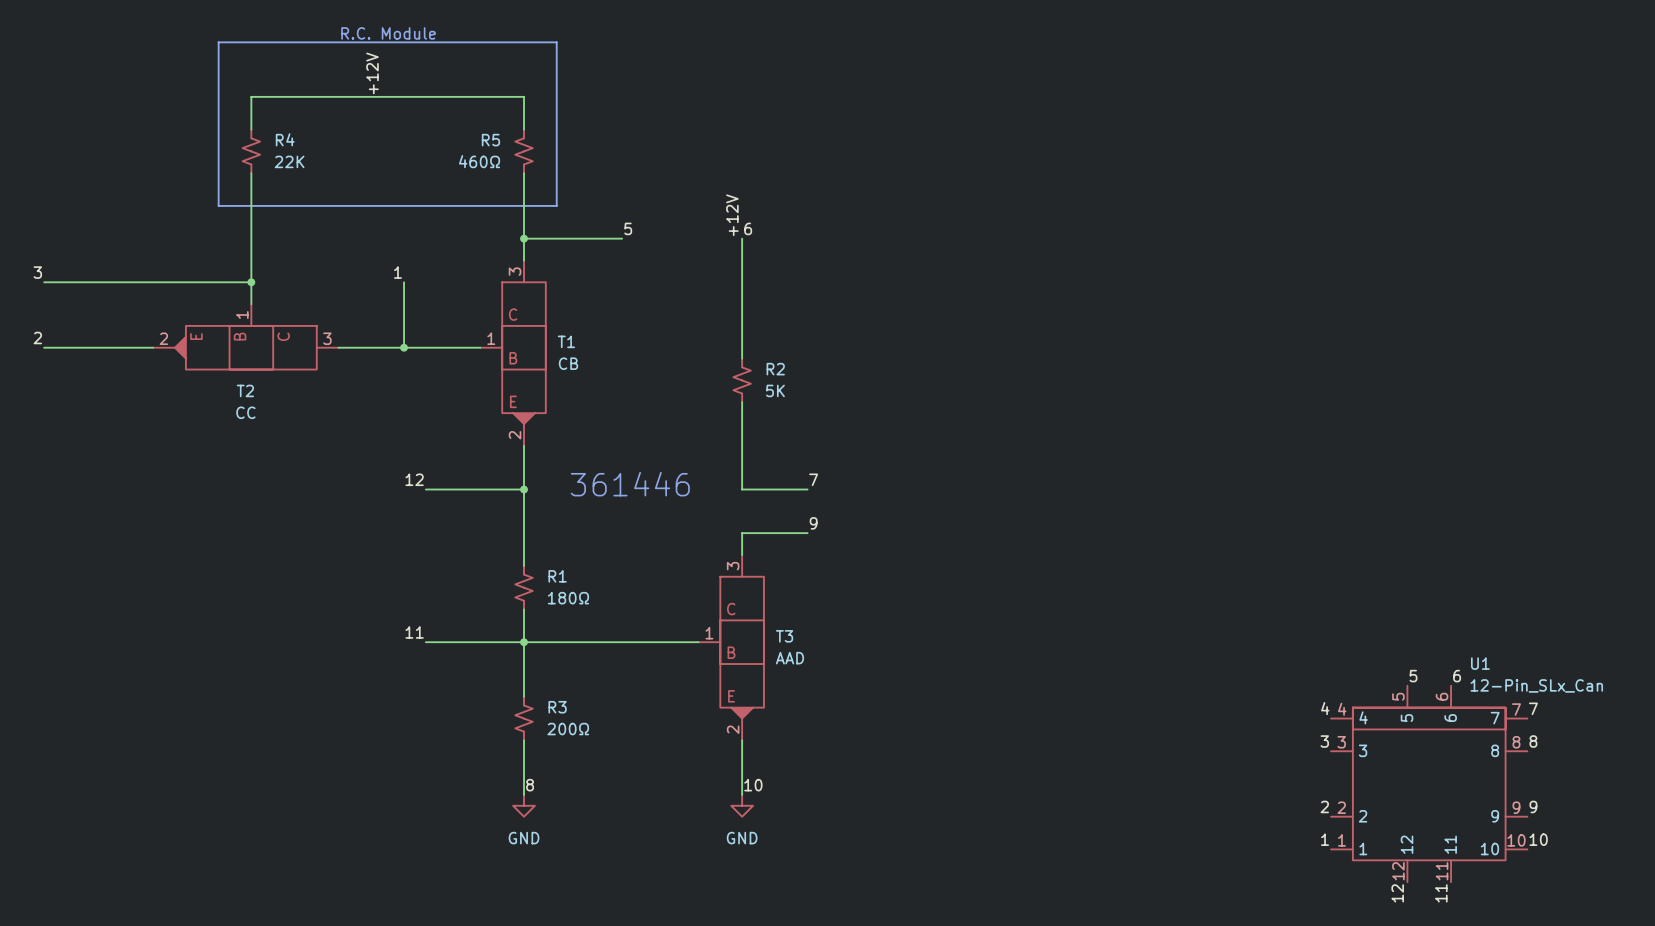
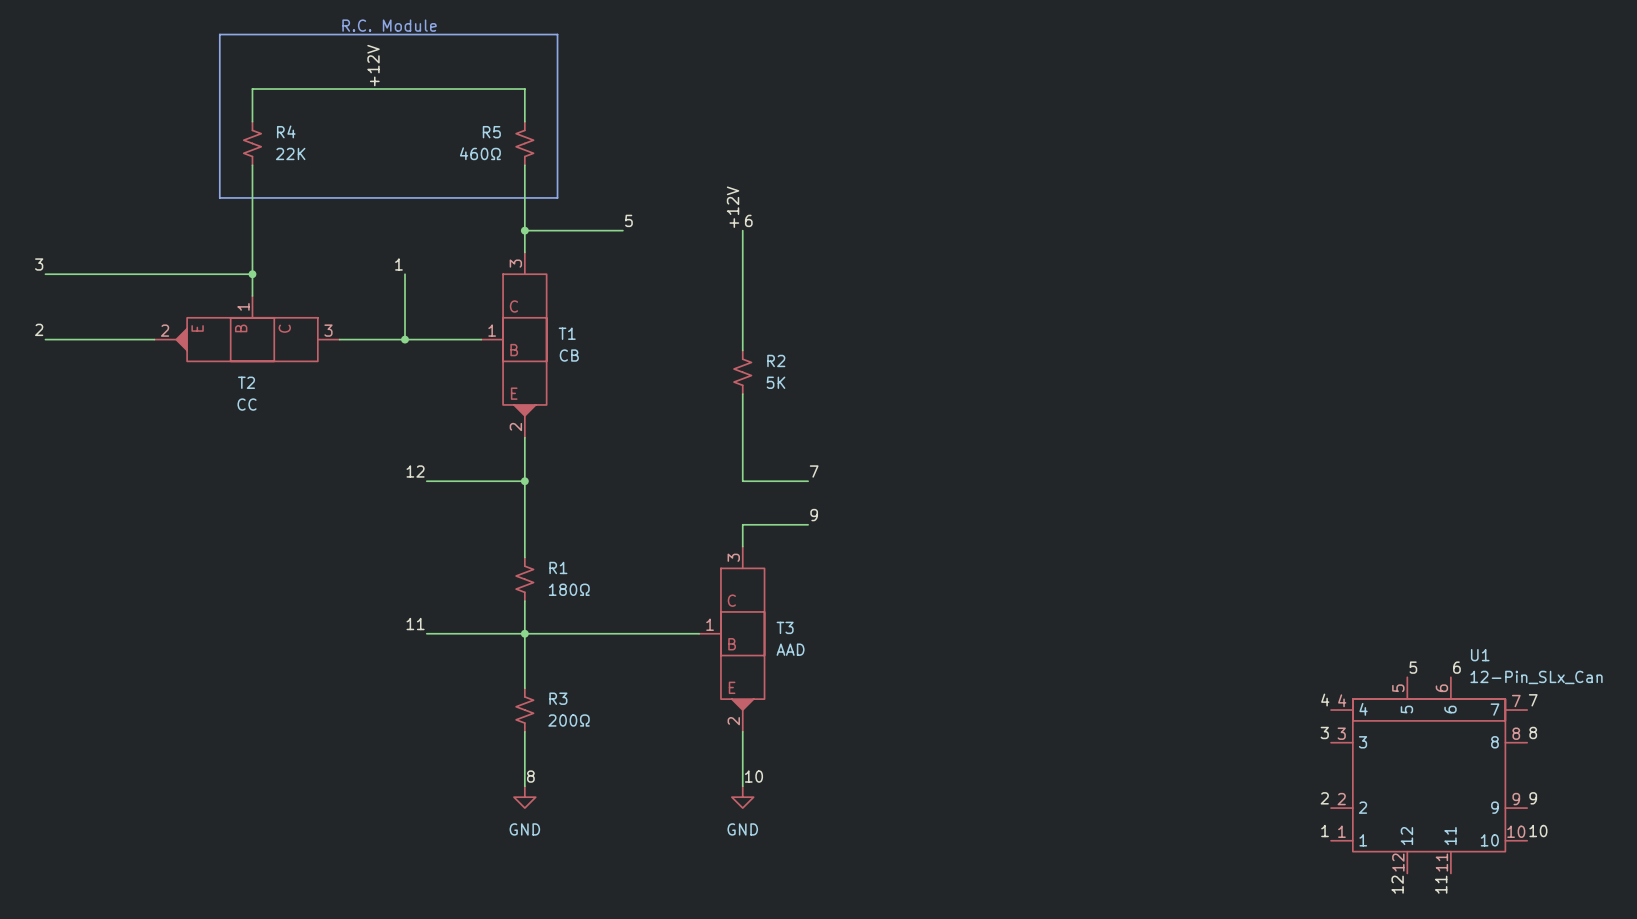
text: 361446 (630, 484) -> none

